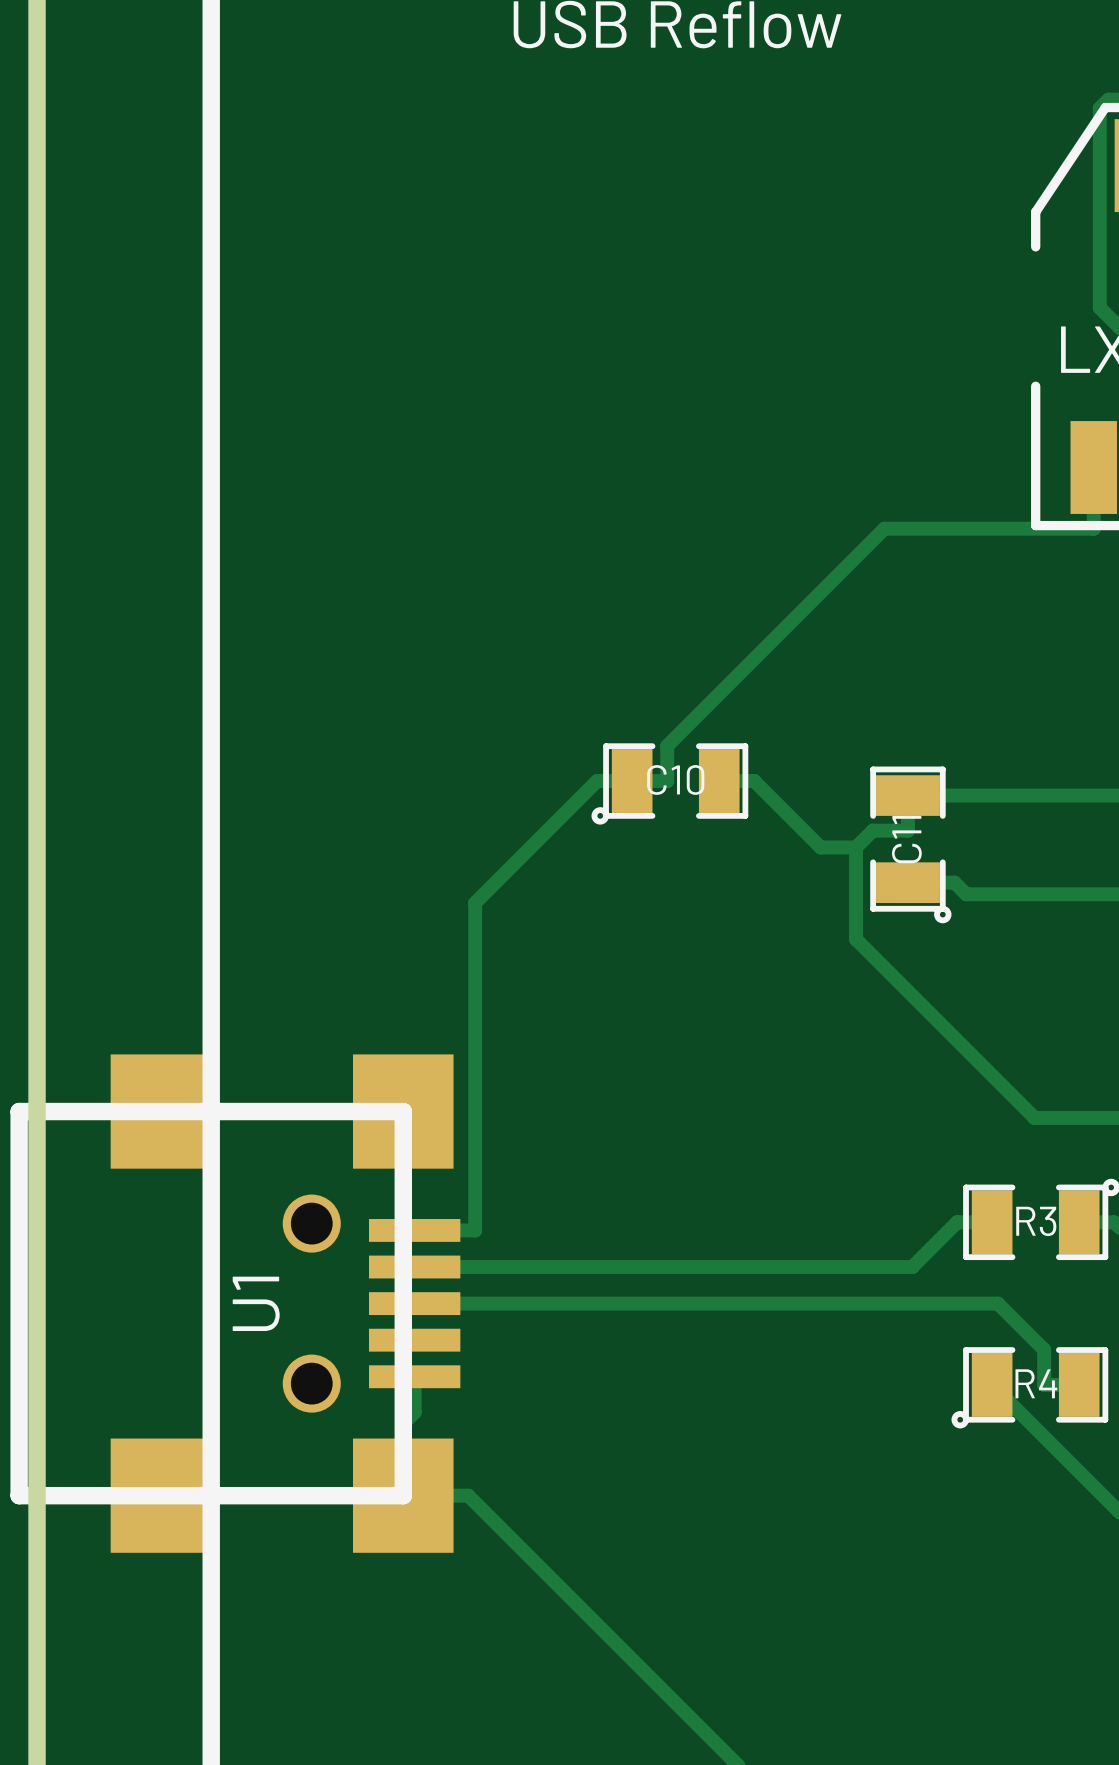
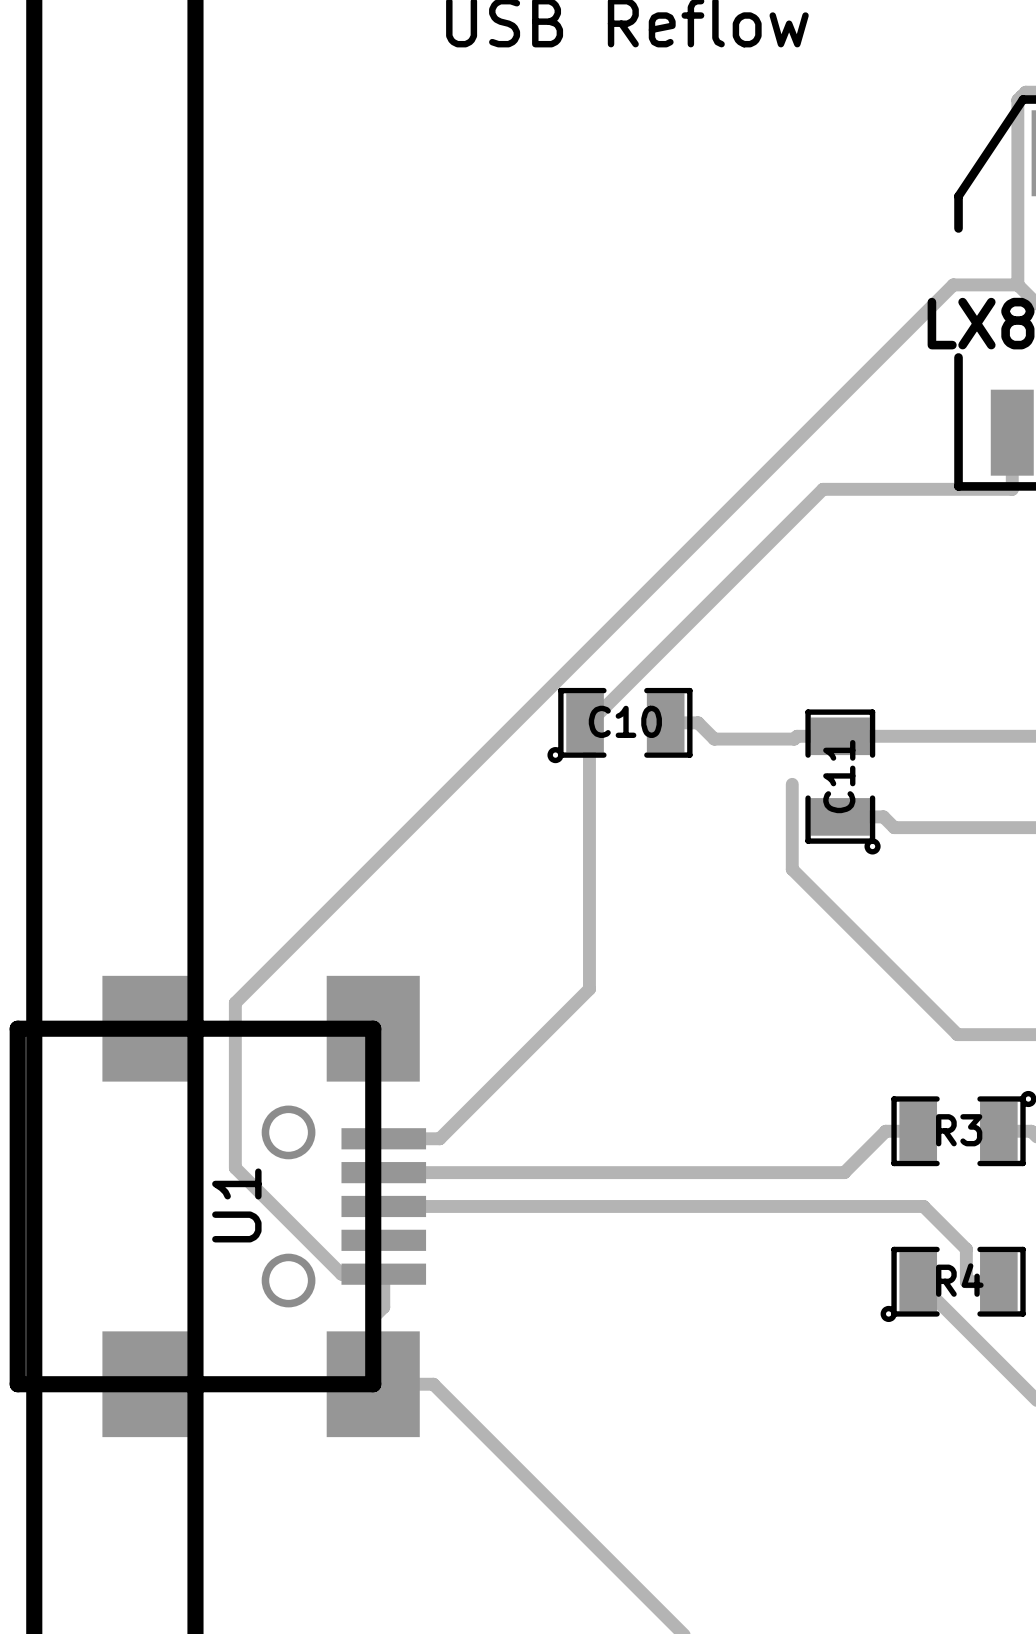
track: none -> (1017, 284) (953, 284) (235, 1002) (235, 1168) (341, 1274) (383, 1274)
track: (889, 528) (884, 528) (667, 745) (667, 781) (636, 781) -> none
track: (632, 781) (597, 781) (475, 902) (475, 1230) -> (823, 489) (589, 722) (589, 989) (439, 1138)
track: (907, 795) (907, 830) (872, 830) (856, 847) (820, 847) (771, 798) -> (840, 736) (797, 736) (794, 739) (714, 739)

